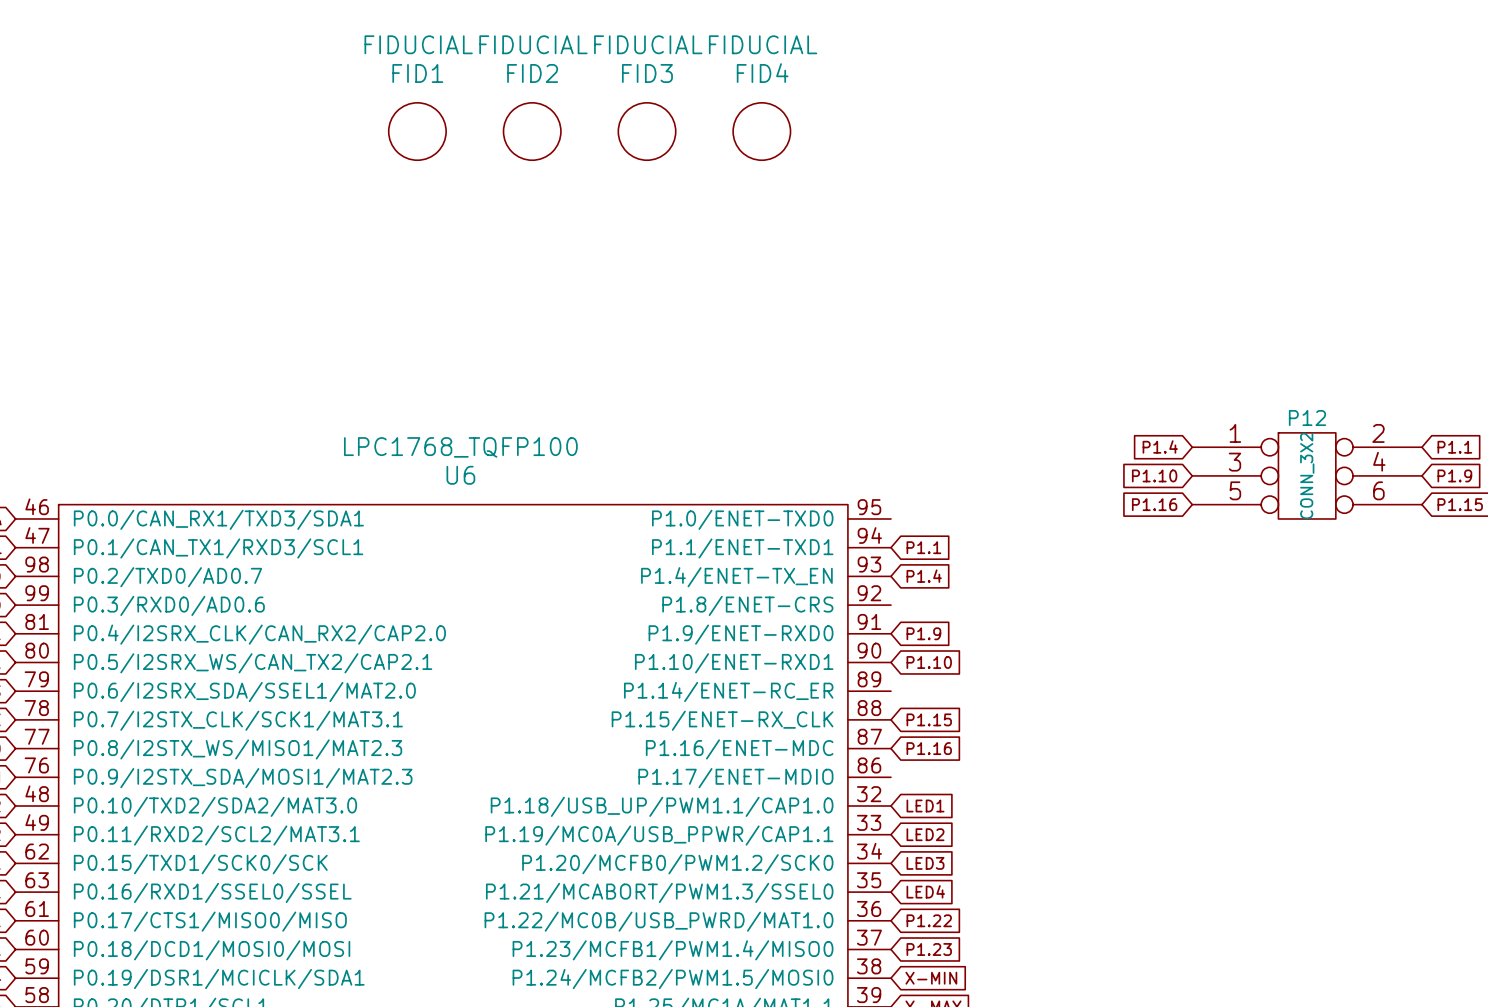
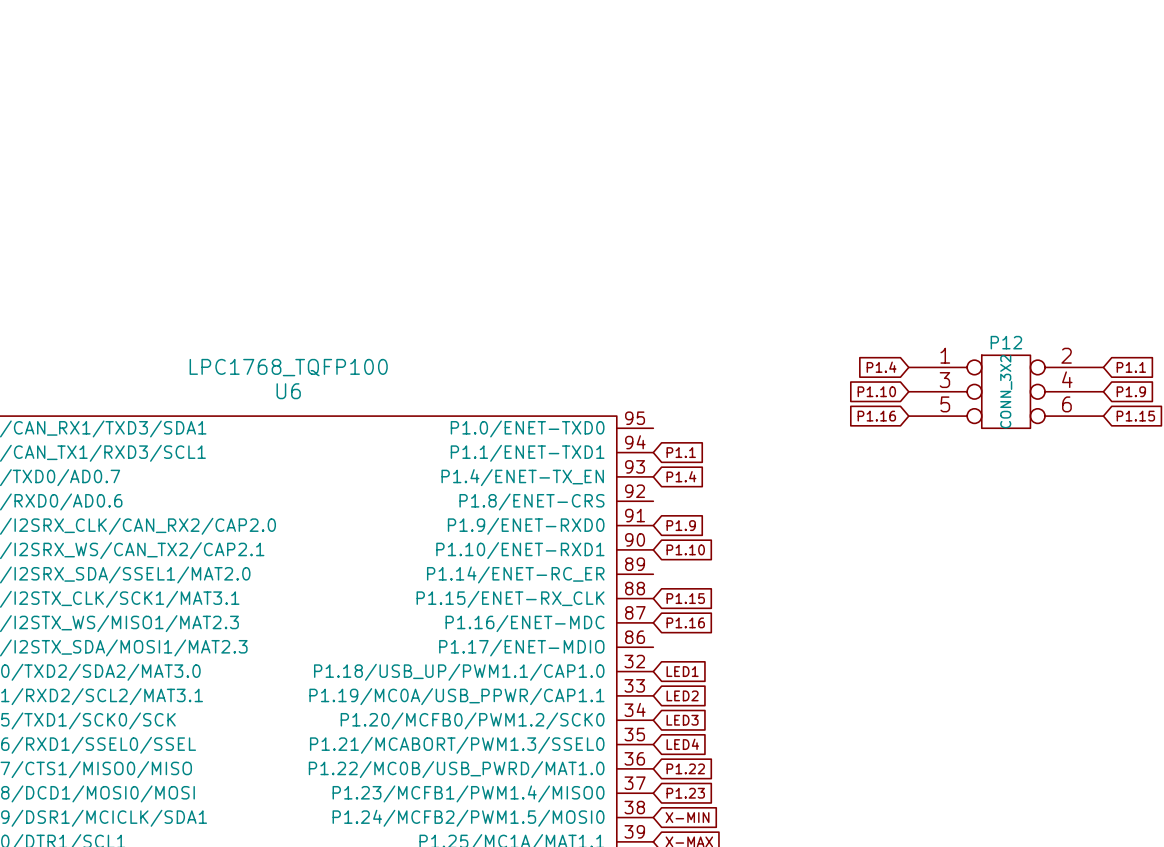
FID1: FIDUCIAL (417, 131) -> none
FID2: FIDUCIAL (532, 131) -> none
FID3: FIDUCIAL (647, 131) -> none
FID4: FIDUCIAL (761, 131) -> none

